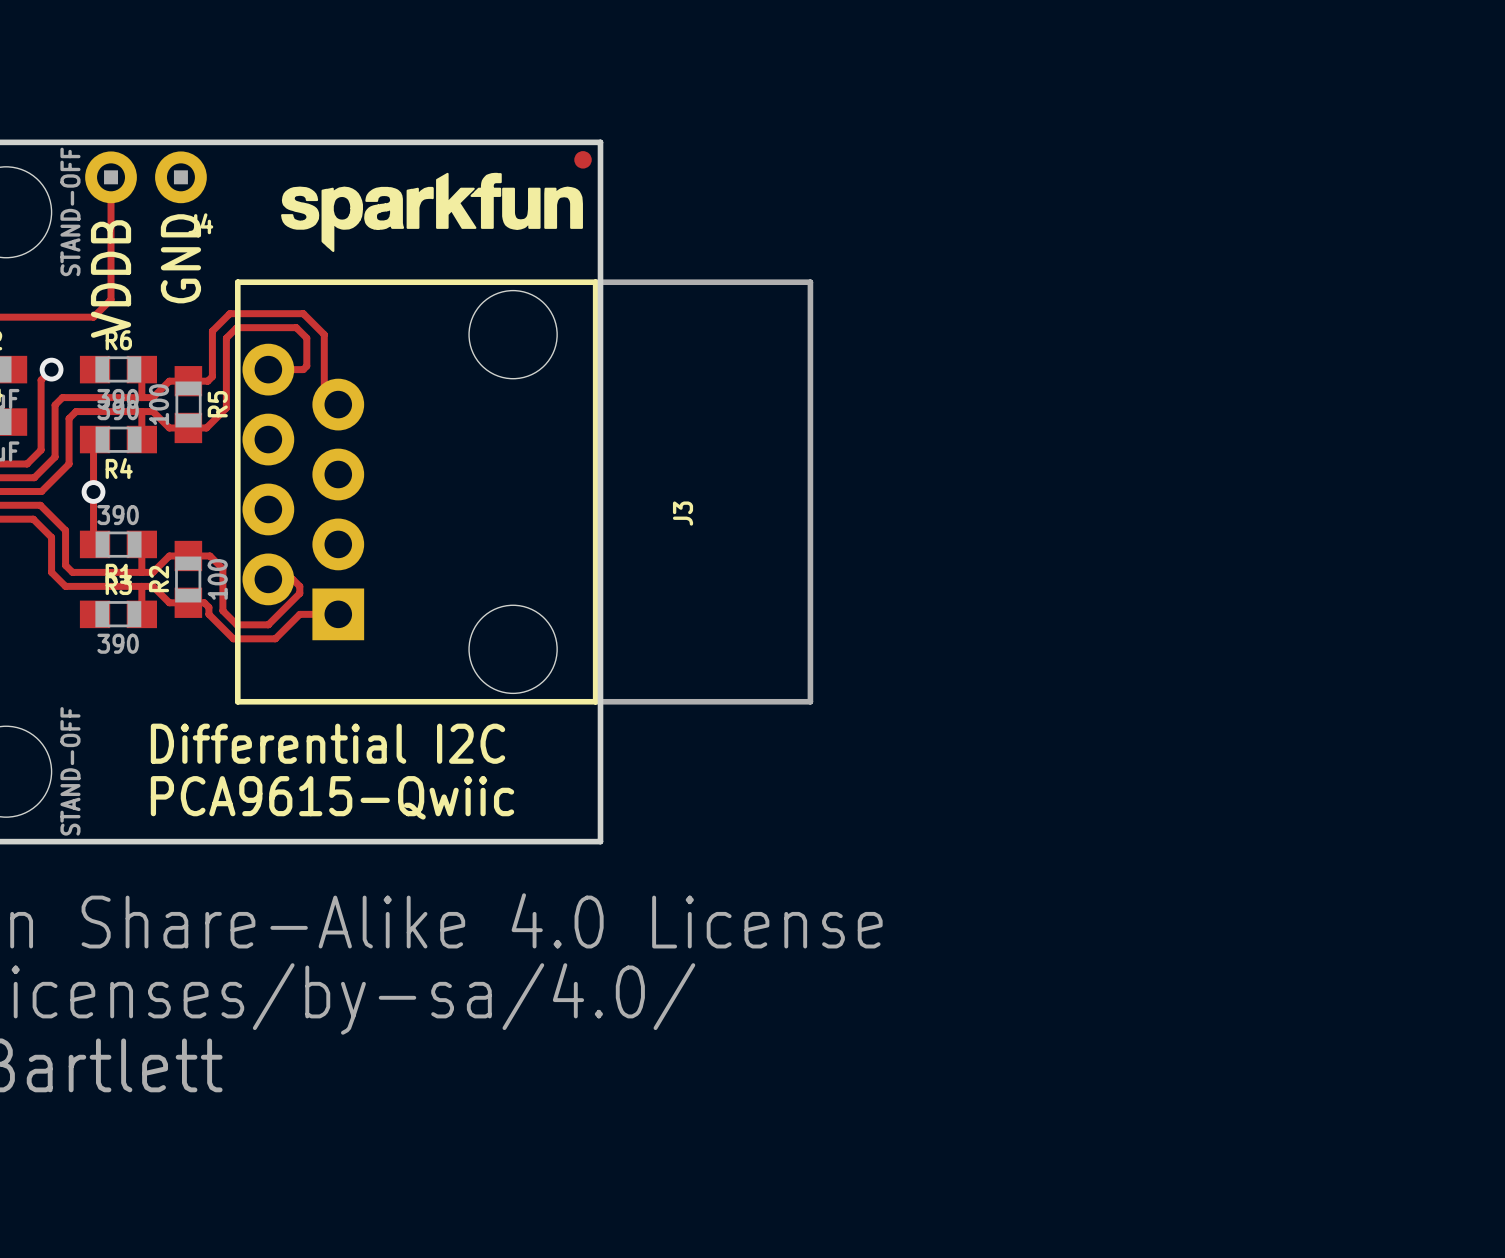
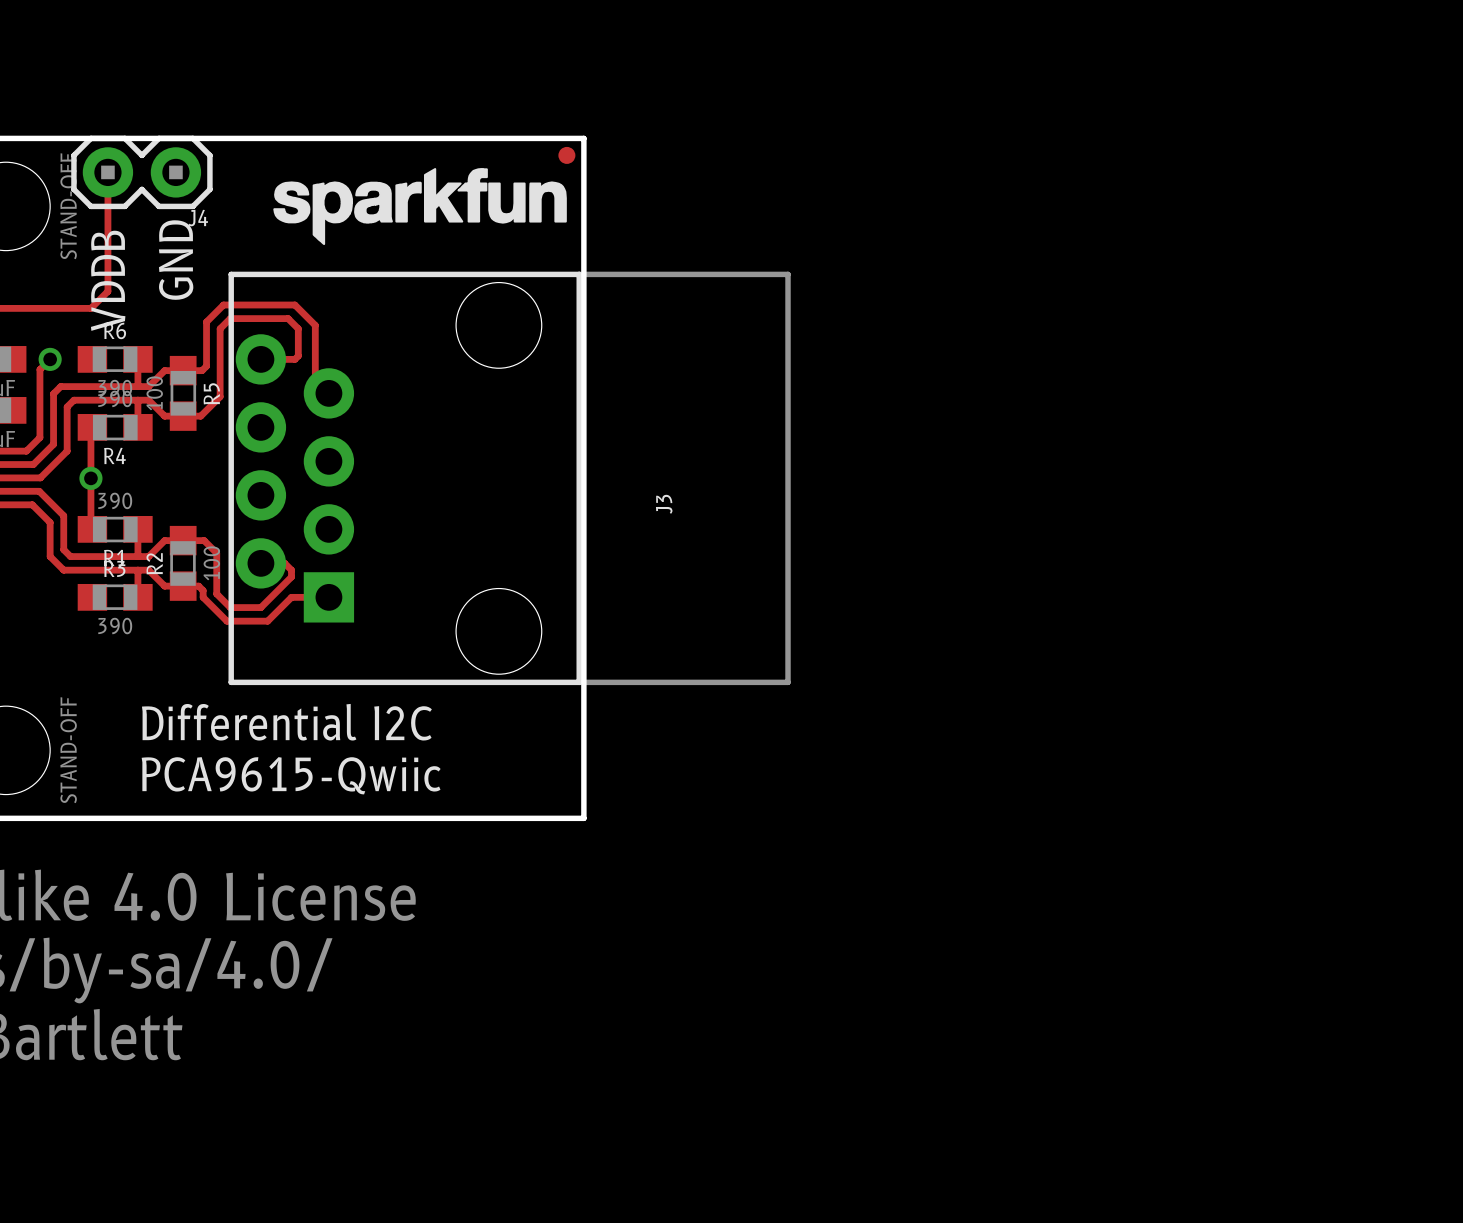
J4 footprint: [85, 151, 207, 204] -> [71, 135, 213, 210]

